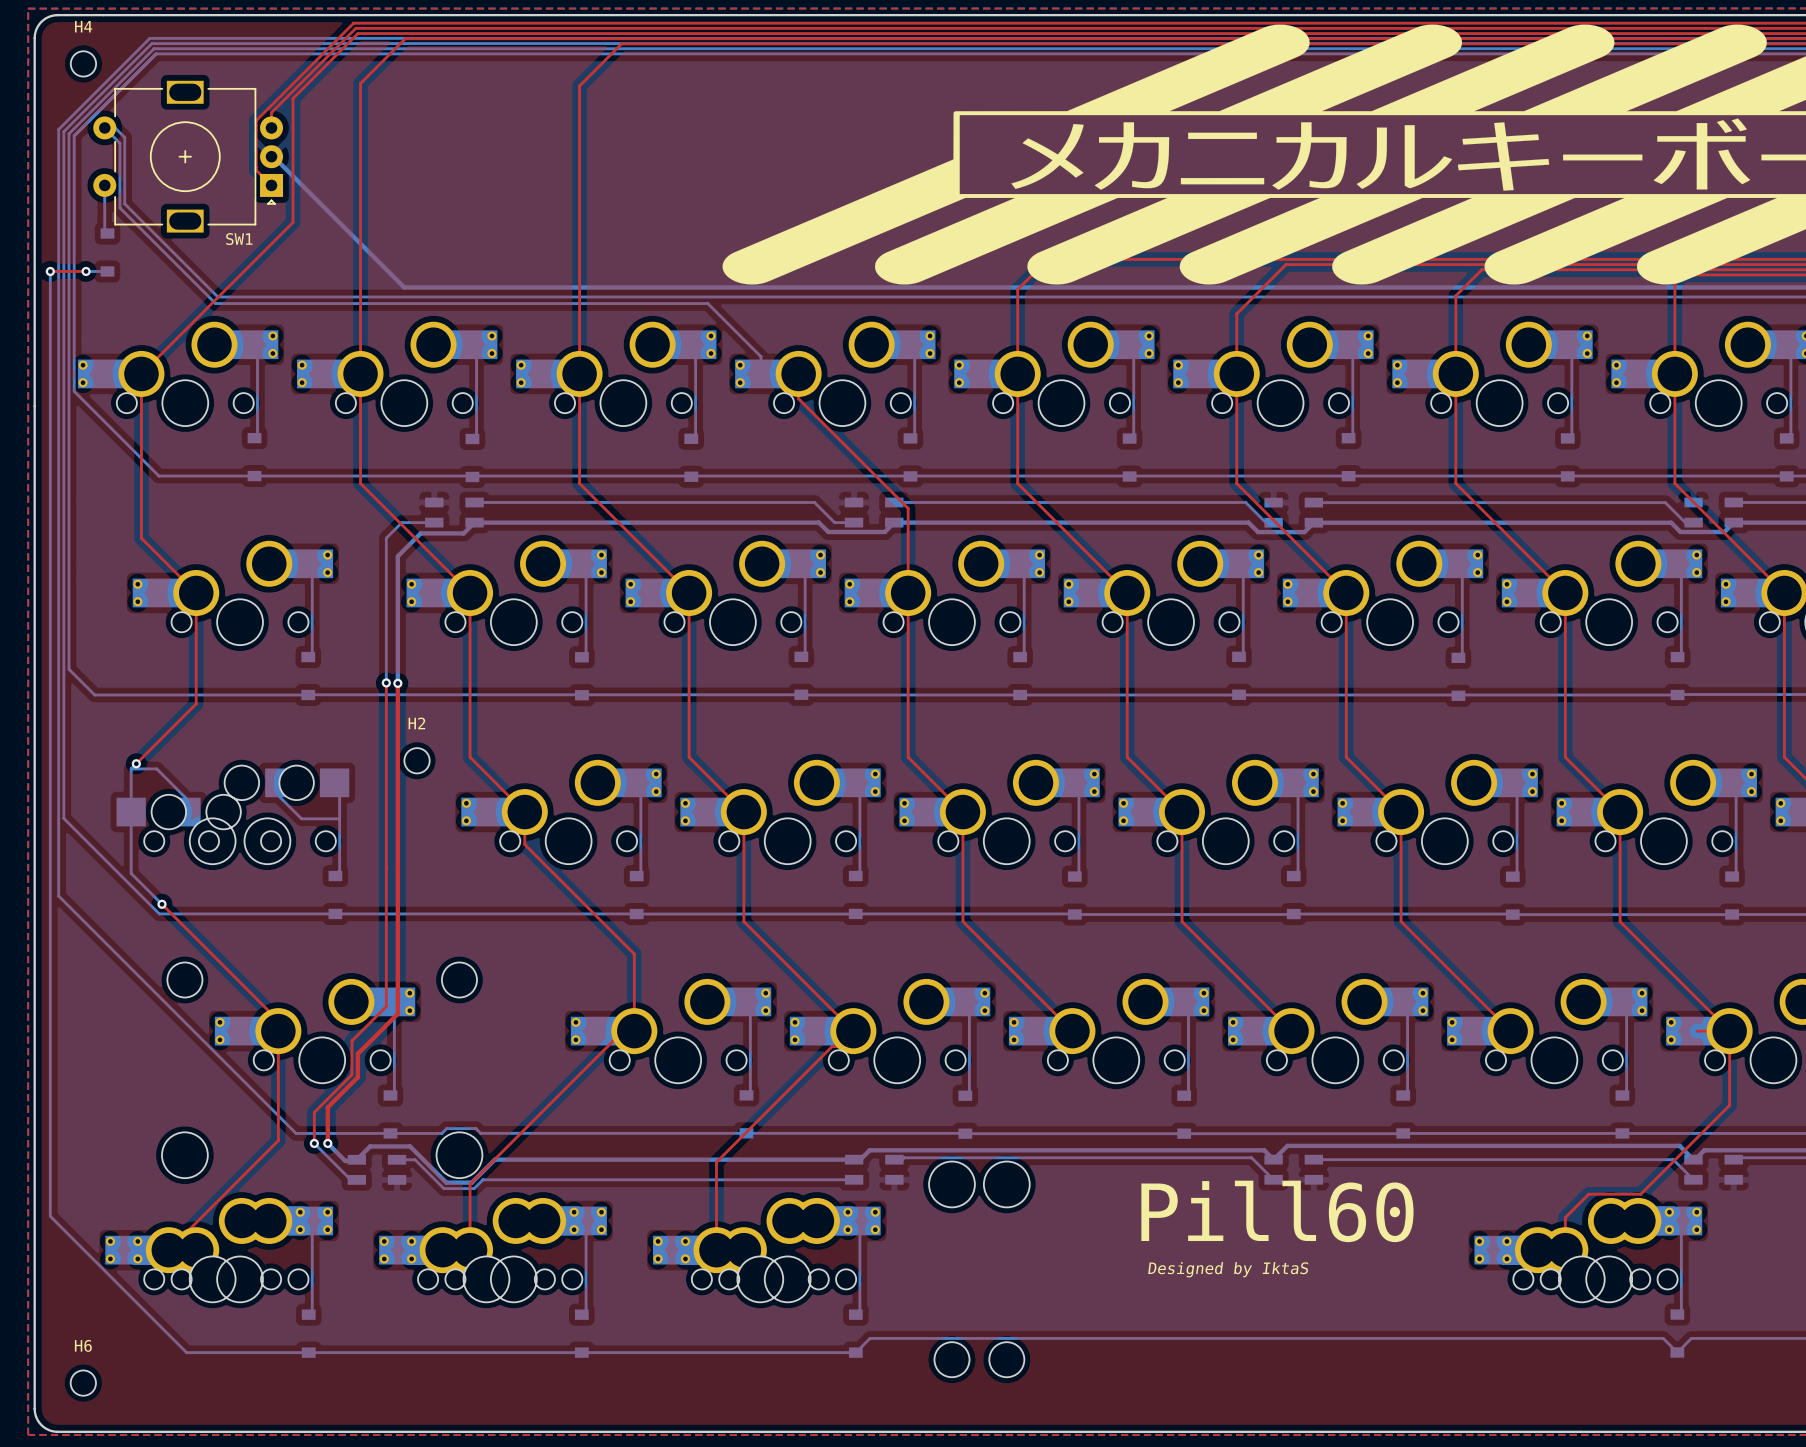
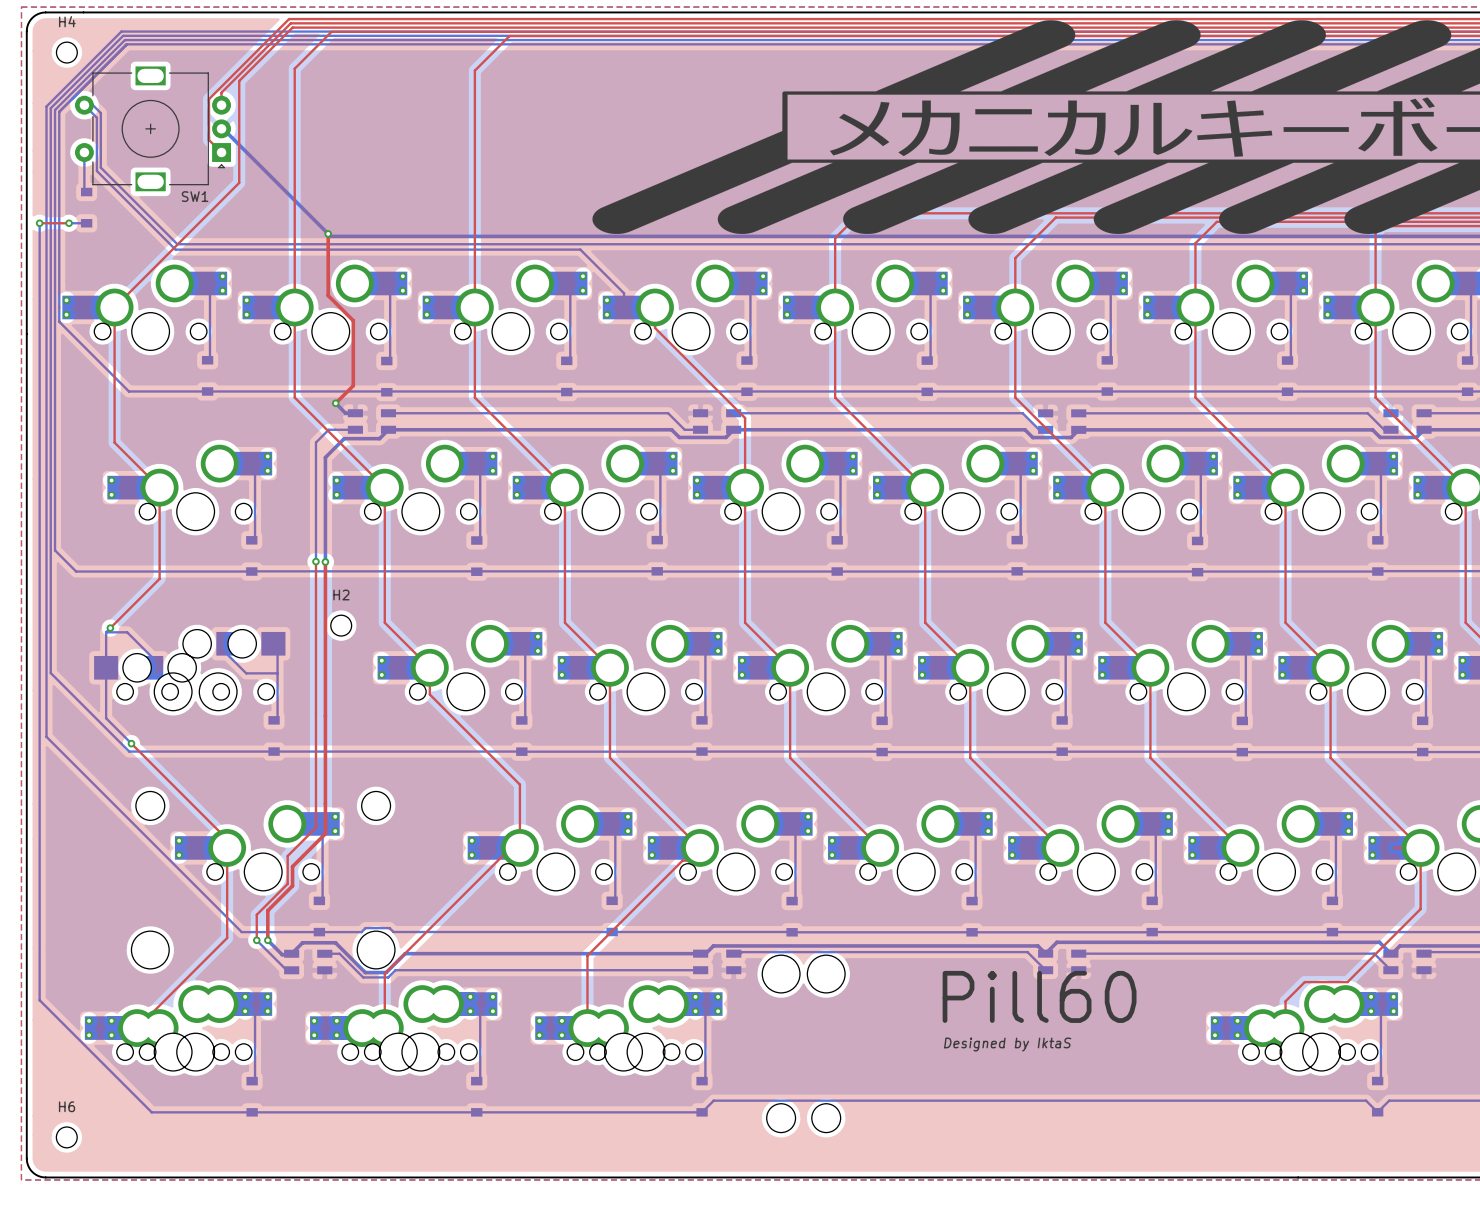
top track: none -> (328, 233) (328, 295) (353, 320) (353, 385) (335, 403)
via: none -> (328, 233)
bottom track: none -> (335, 403) (345, 413) (355, 413)
via: none -> (335, 403)

